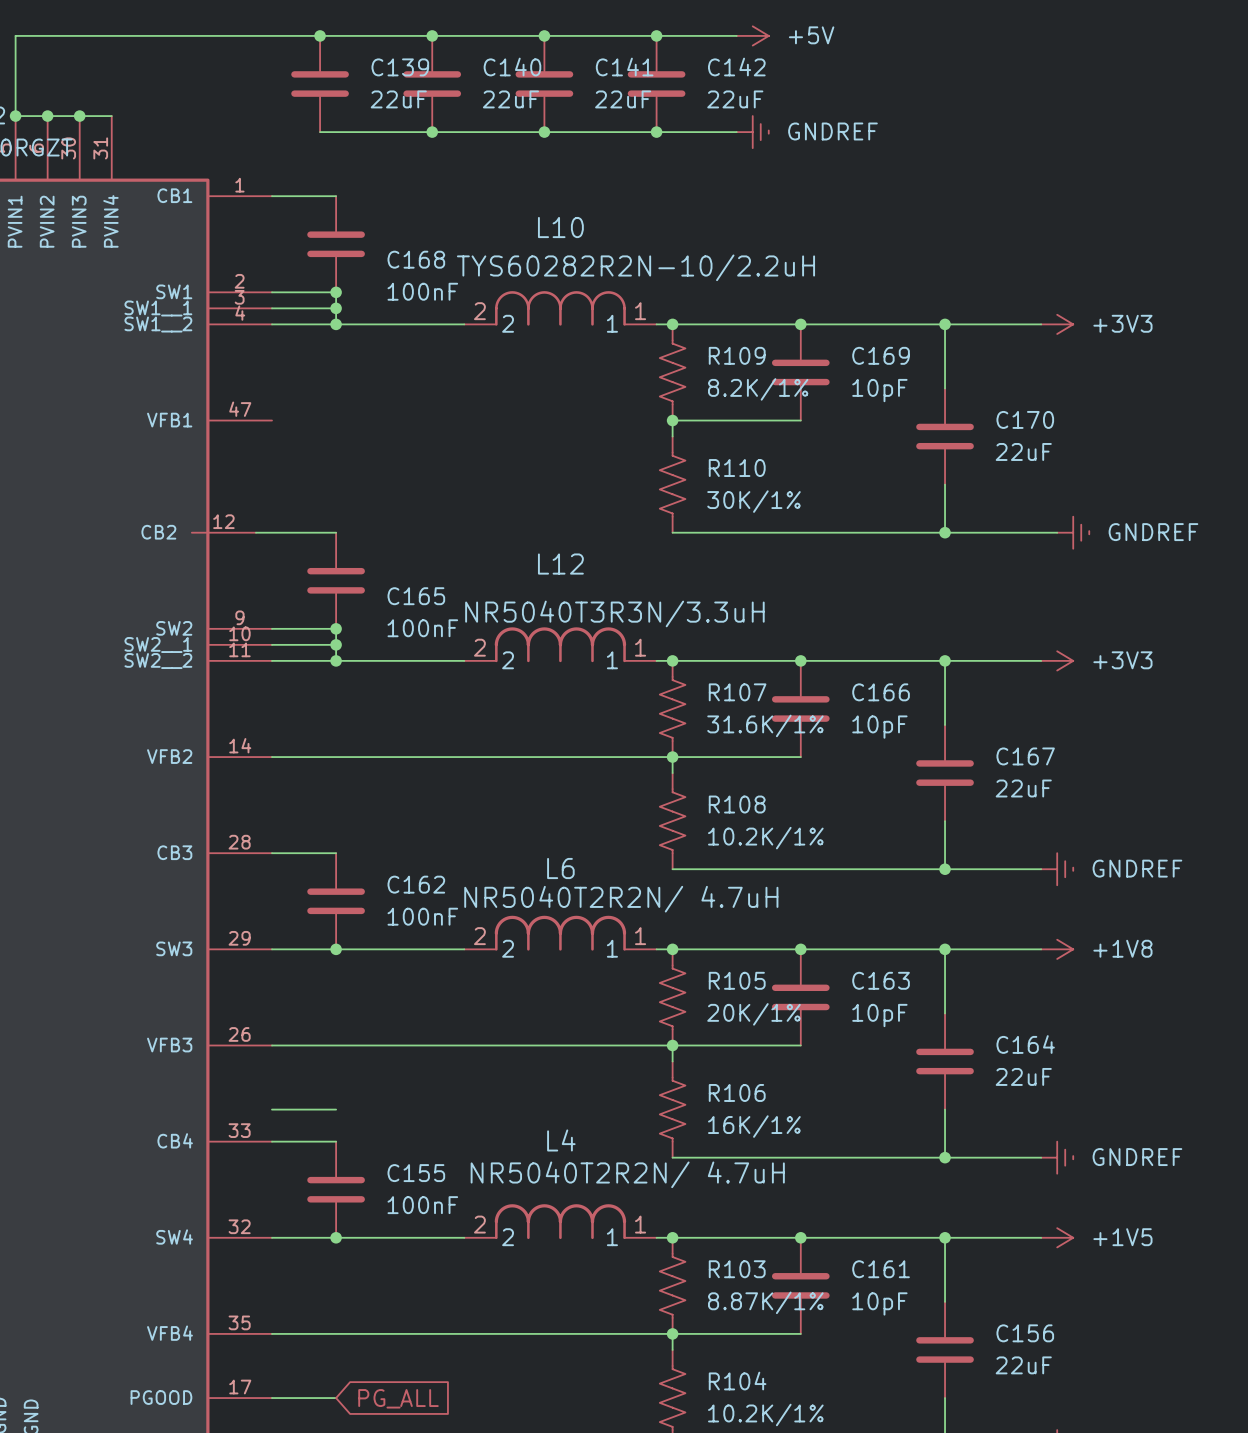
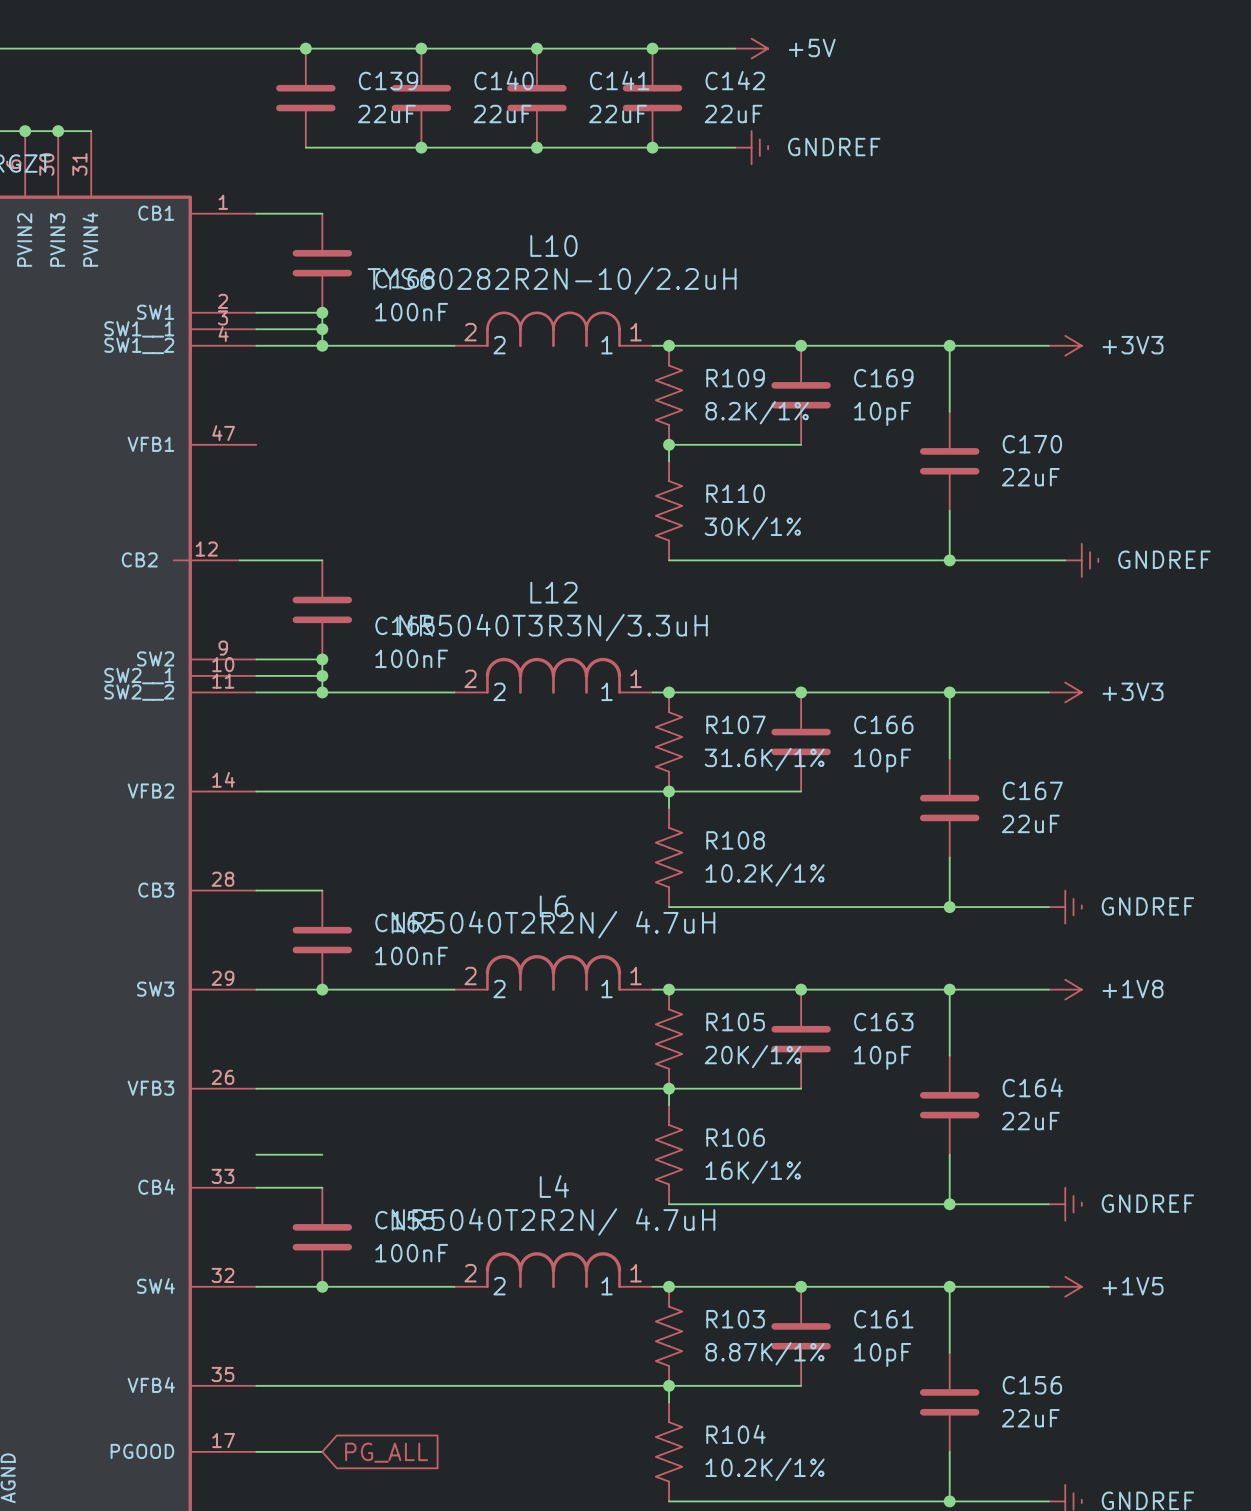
L10 value position: TYS60282R2N-10/2.2uH (635, 267) -> TYS60282R2N-10/2.2uH (552, 280)
L12 value position: NR5040T3R3N/3.3uH (614, 613) -> NR5040T3R3N/3.3uH (553, 627)
L6 value position: NR5040T2R2N/ 4.7uH (621, 899) -> NR5040T2R2N/ 4.7uH (553, 924)
L4 value position: NR5040T2R2N/ 4.7uH (627, 1174) -> NR5040T2R2N/ 4.7uH (553, 1221)

